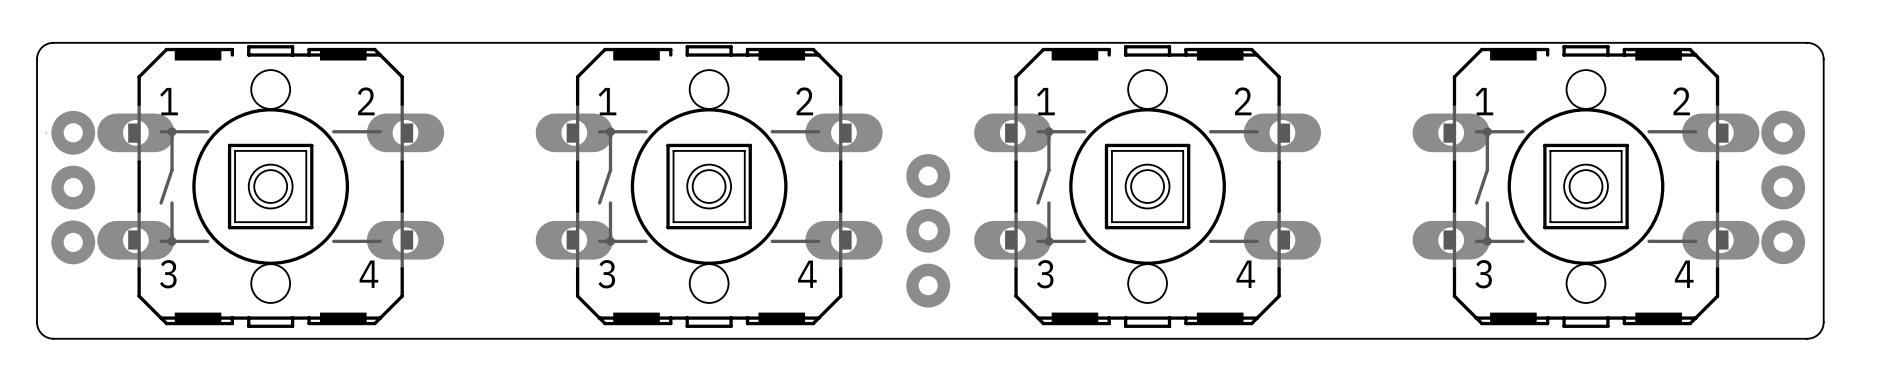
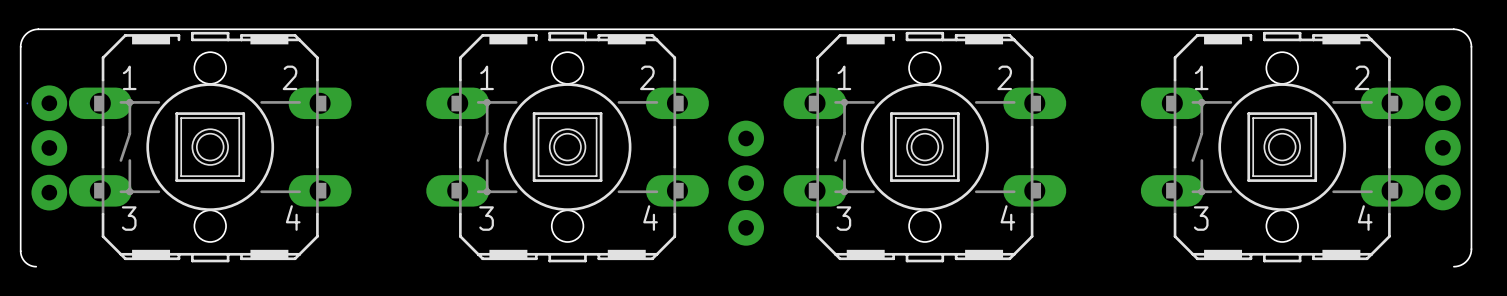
board edge: (1807, 42) (51, 42) (40, 49) (37, 59) (37, 324) (43, 335) (53, 338) (1809, 338) (1820, 332) (1823, 322) (1823, 59) (1818, 47) (1807, 42) -> none
board edge: none -> (1453, 266) (1466, 261) (1471, 249) (1471, 44) (1466, 34) (1456, 29) (38, 29) (25, 34) (20, 46) (20, 253) (25, 262) (36, 266)

